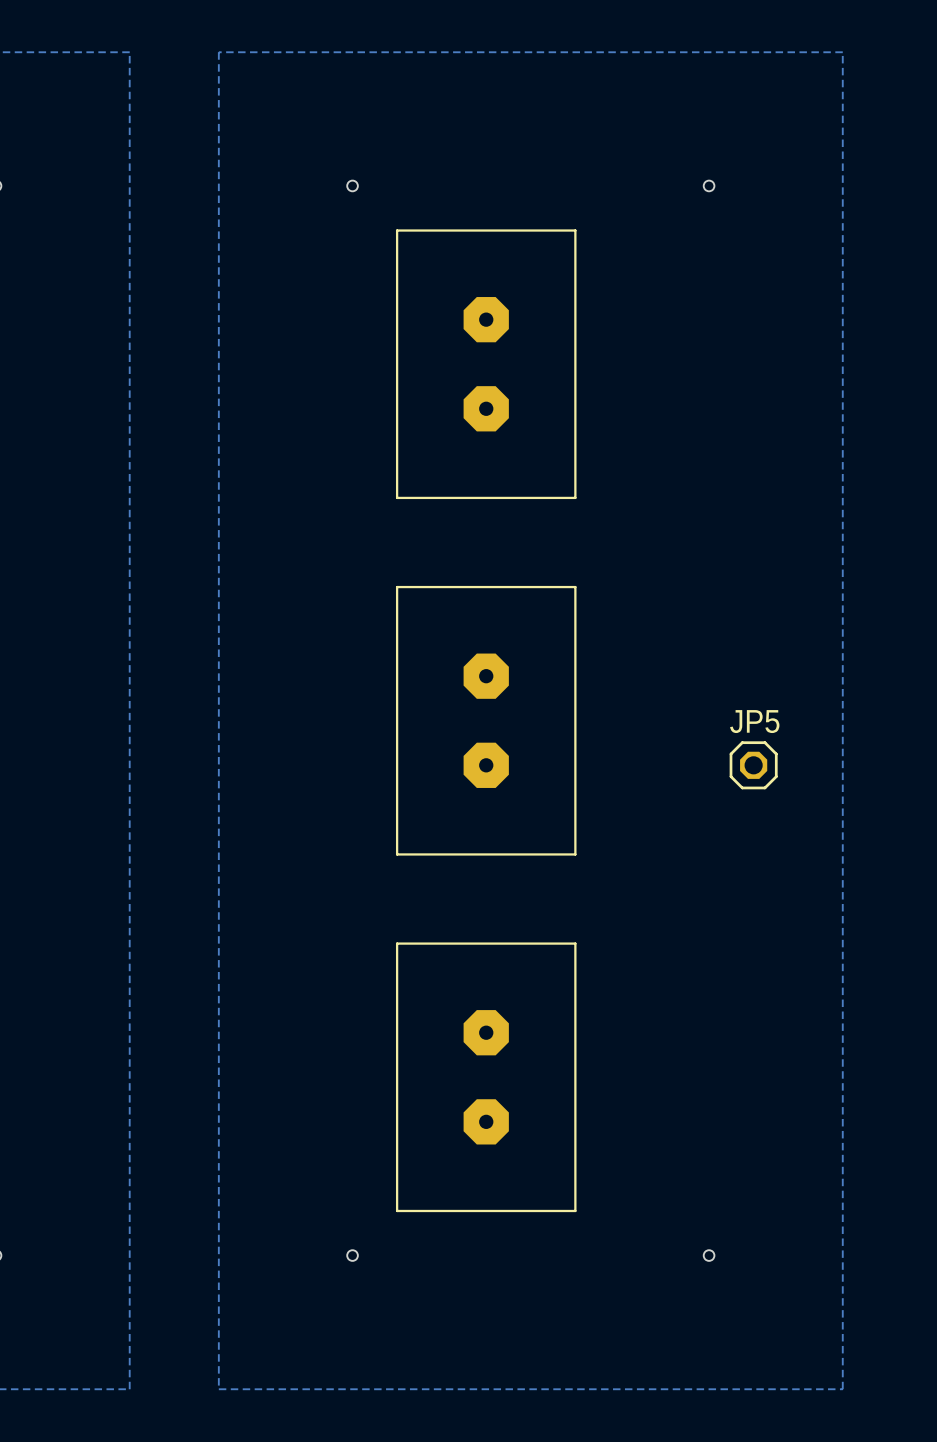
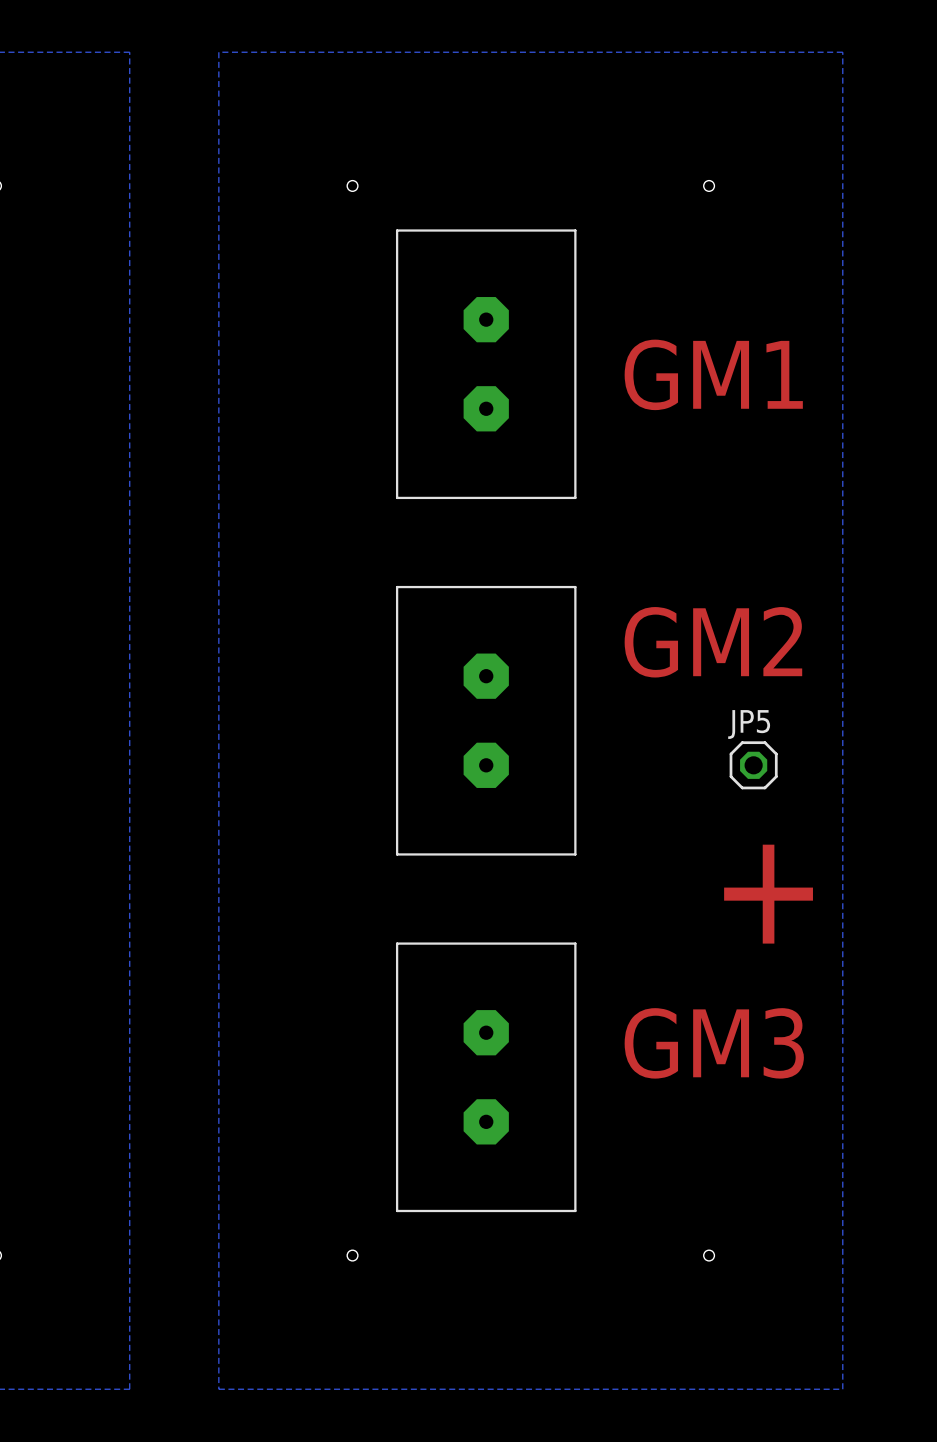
text: none -> GM1 (713, 374)
text: none -> GM2 (713, 642)
text: none -> + (768, 894)
text: none -> GM3 (714, 1043)

